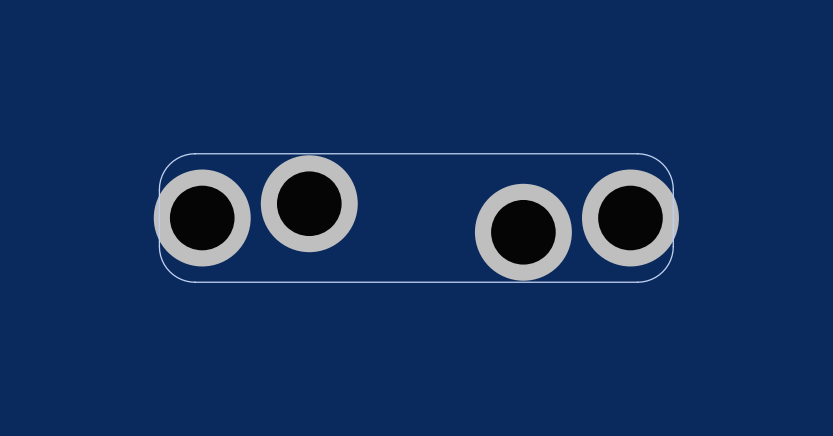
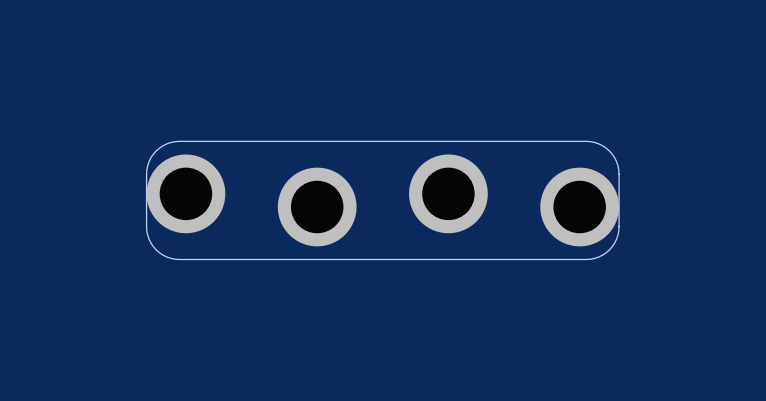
via size: [153, 169, 251, 267] -> [146, 154, 226, 234]
via size: [581, 169, 679, 267] -> [540, 167, 620, 247]
via position: (309, 203) -> (317, 207)
via position: (523, 232) -> (448, 193)

